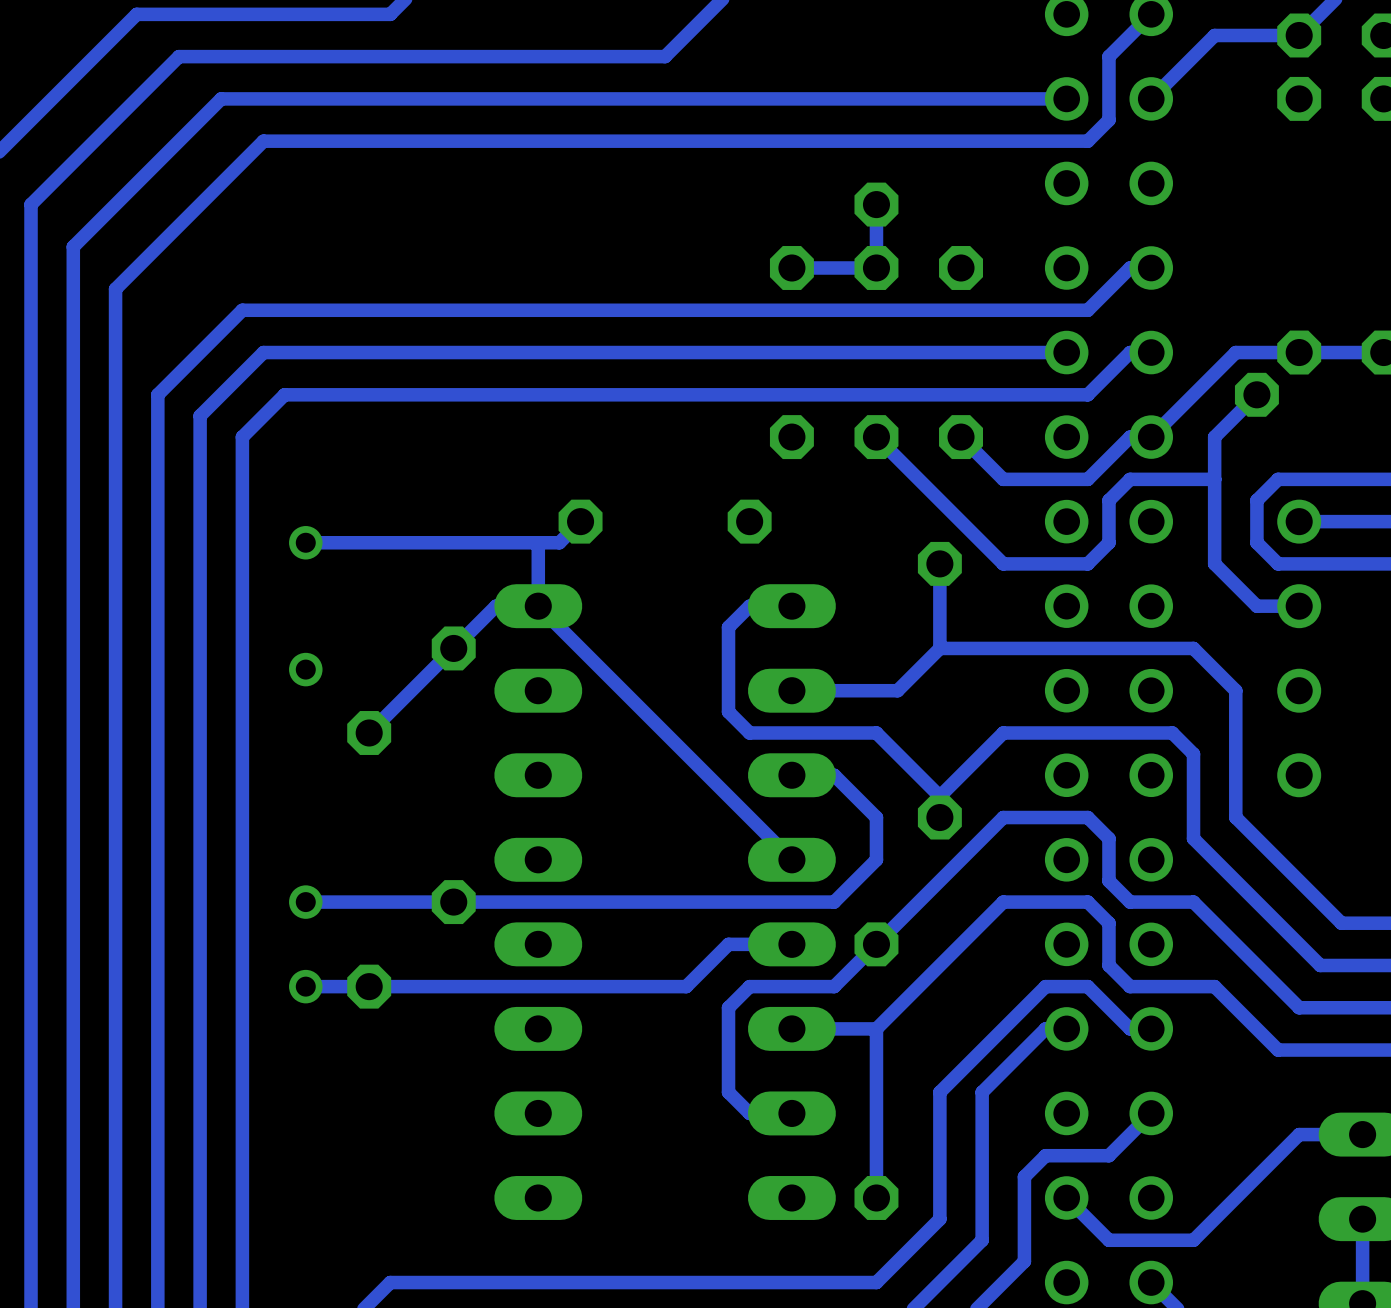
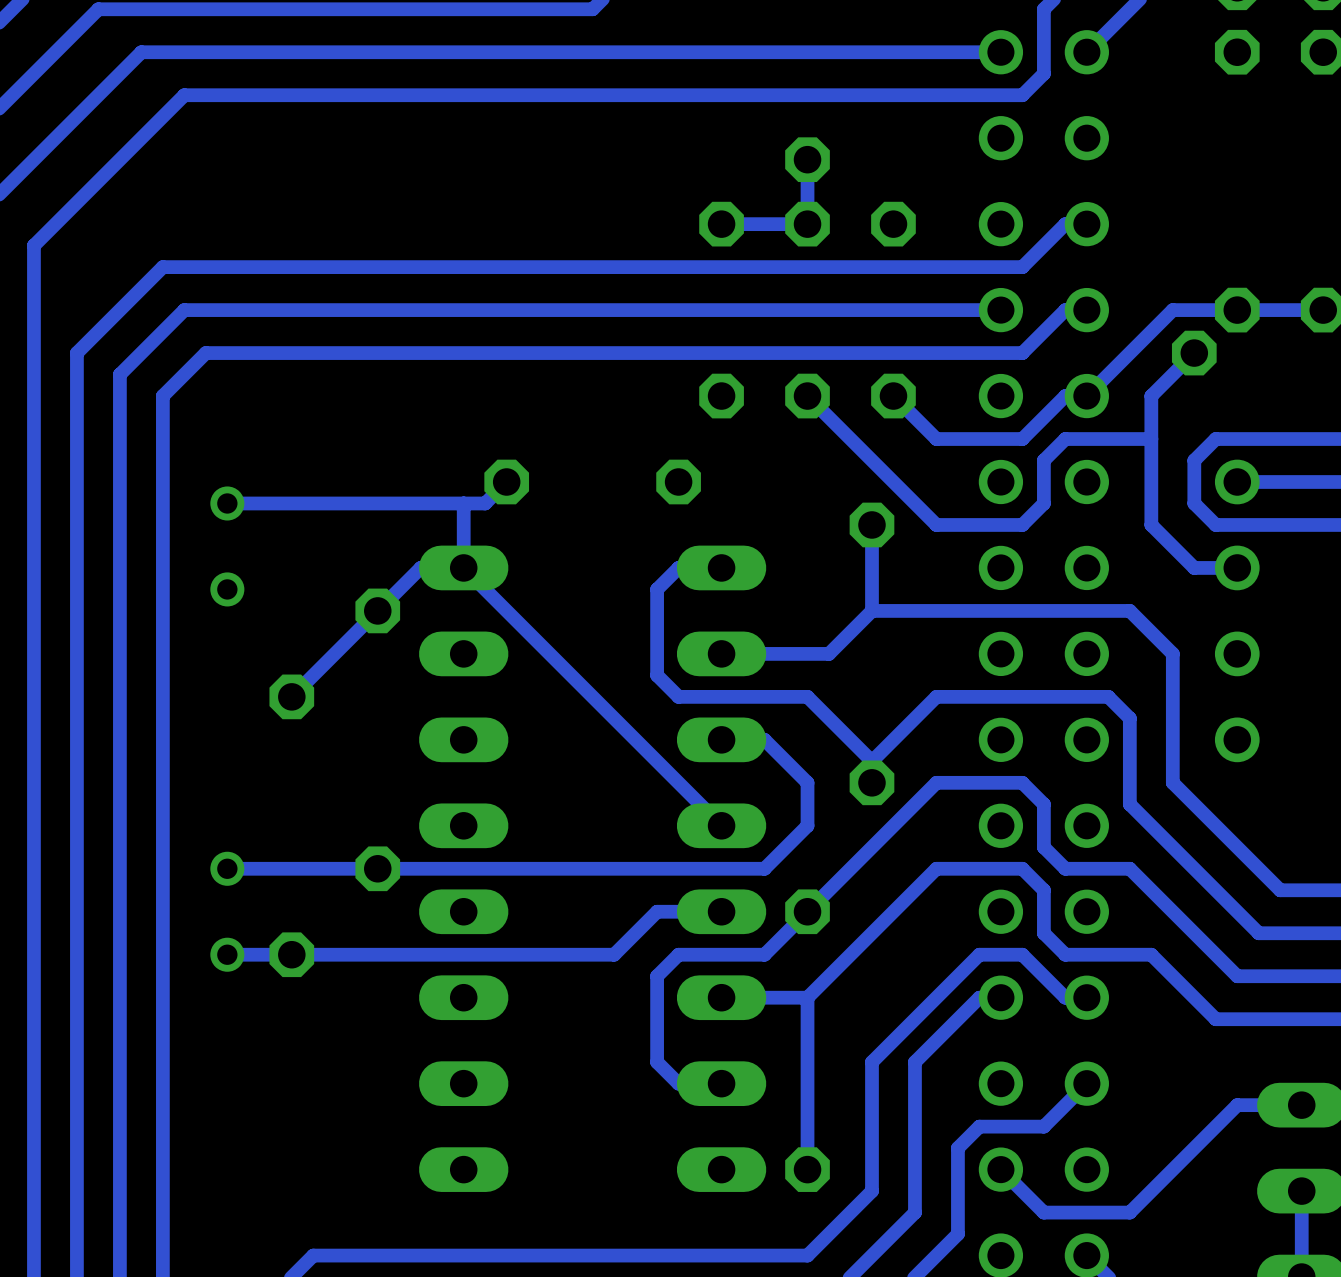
via position: (305, 669) -> (227, 589)

